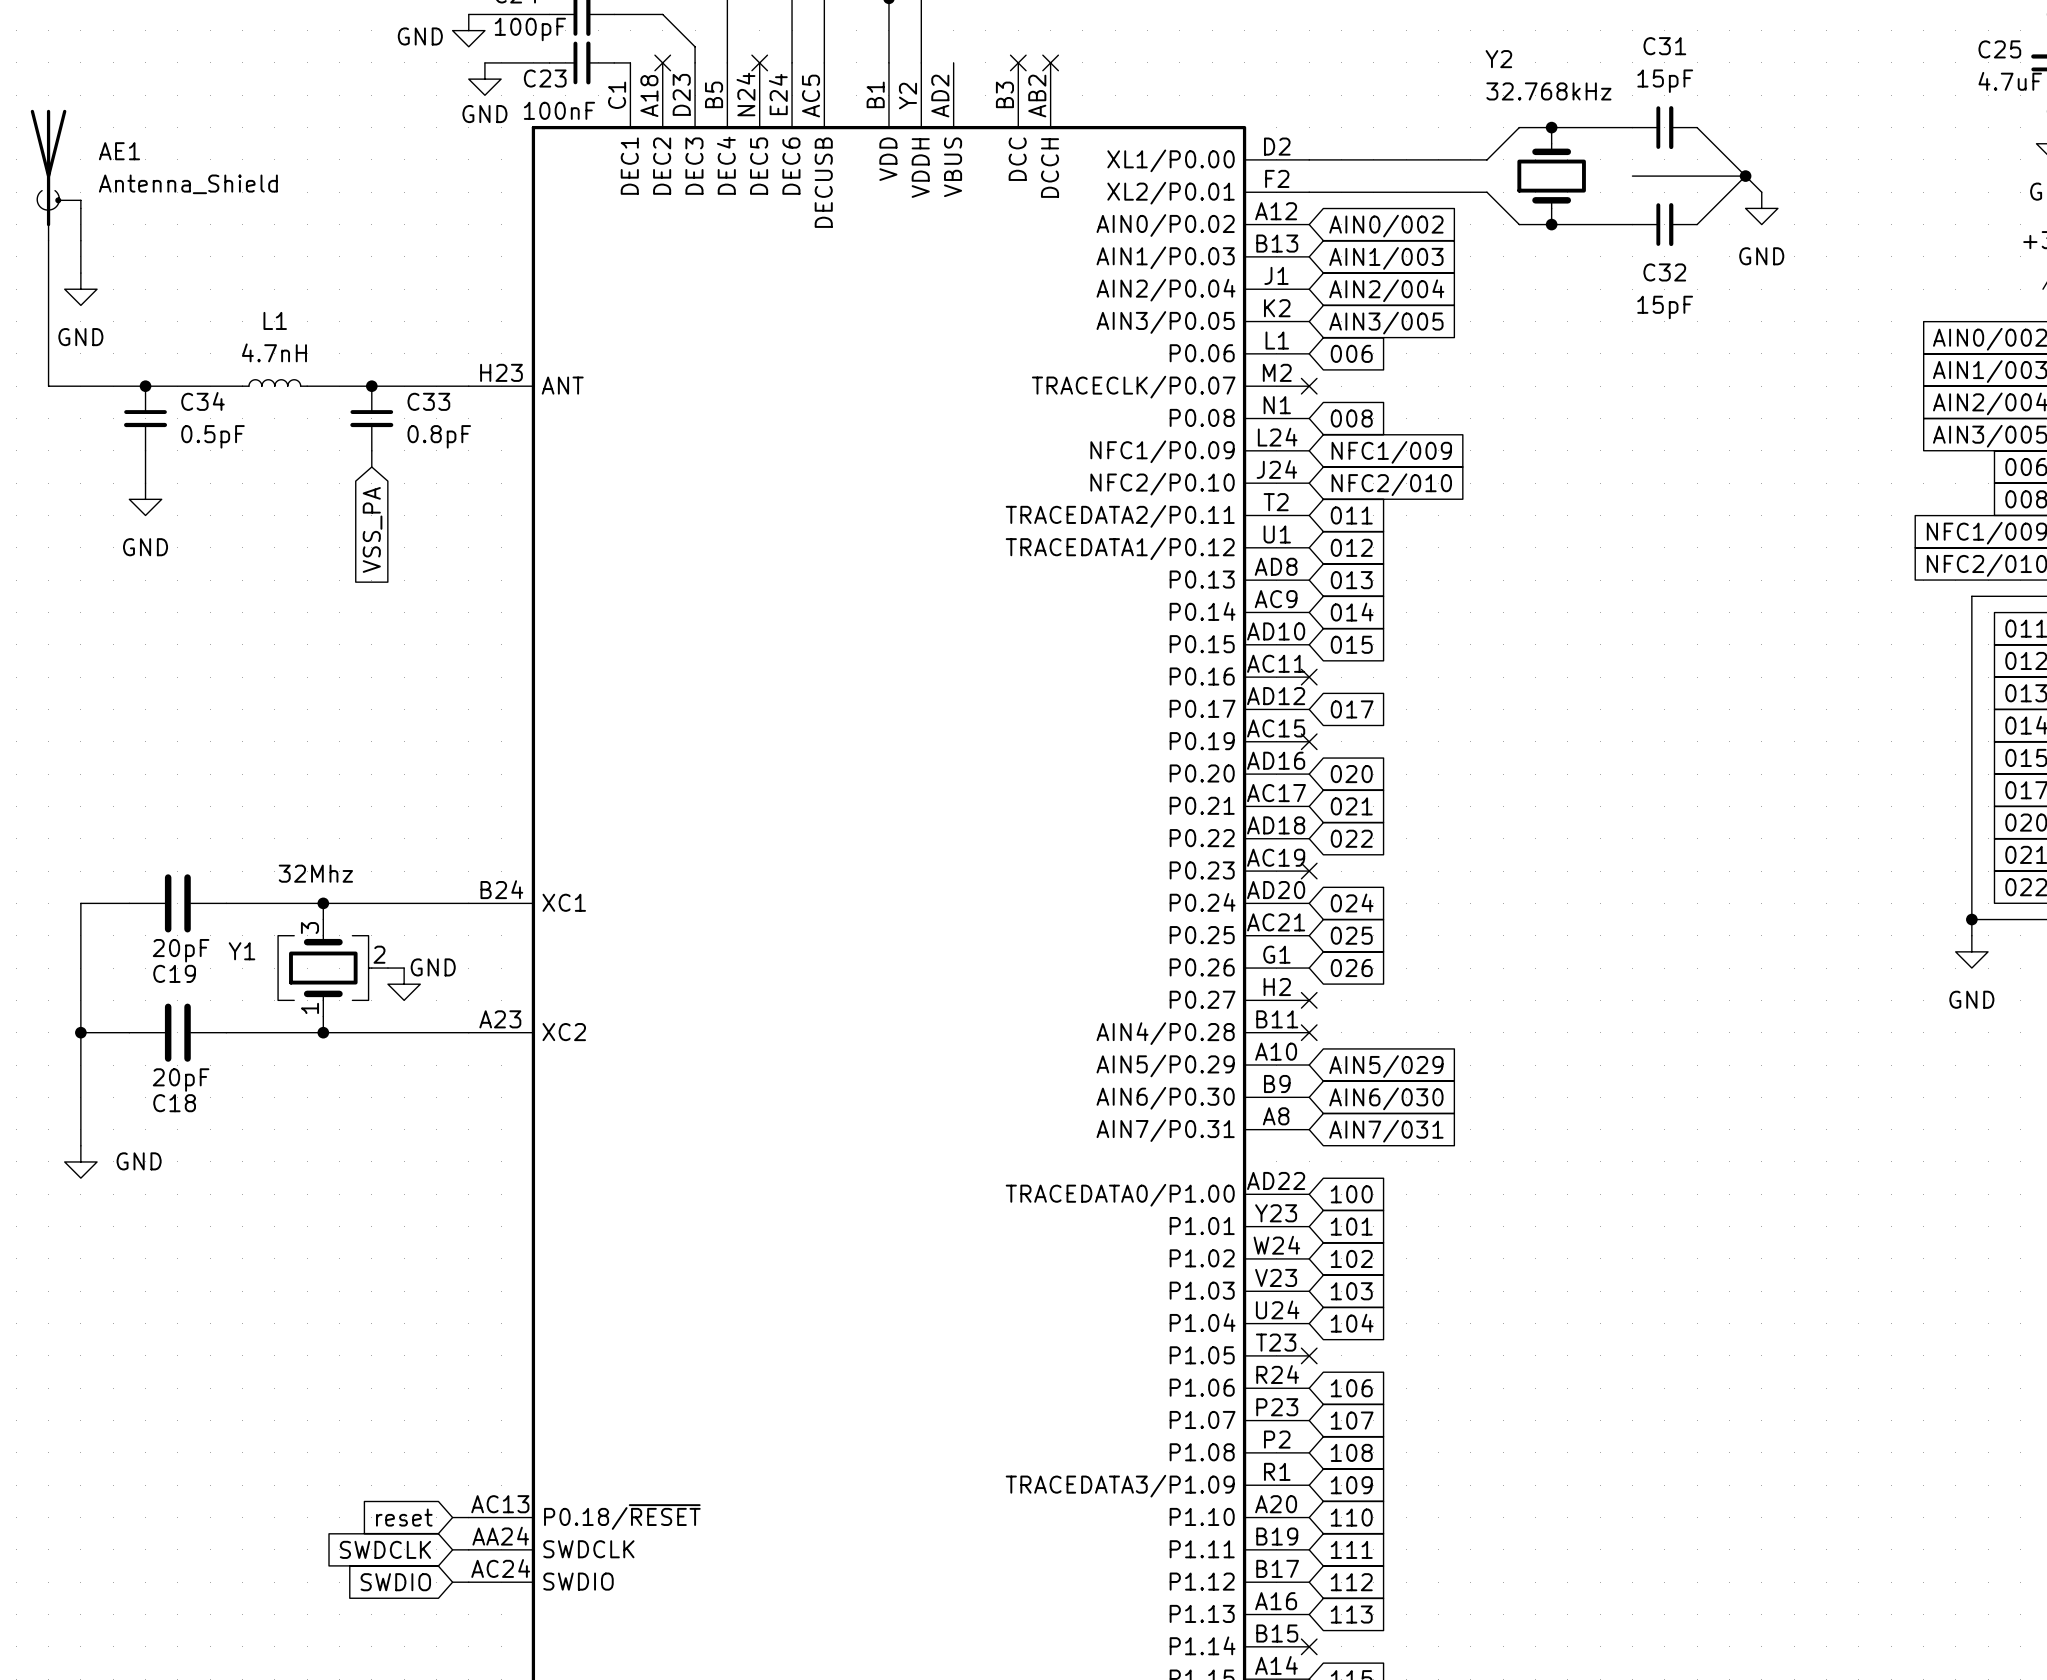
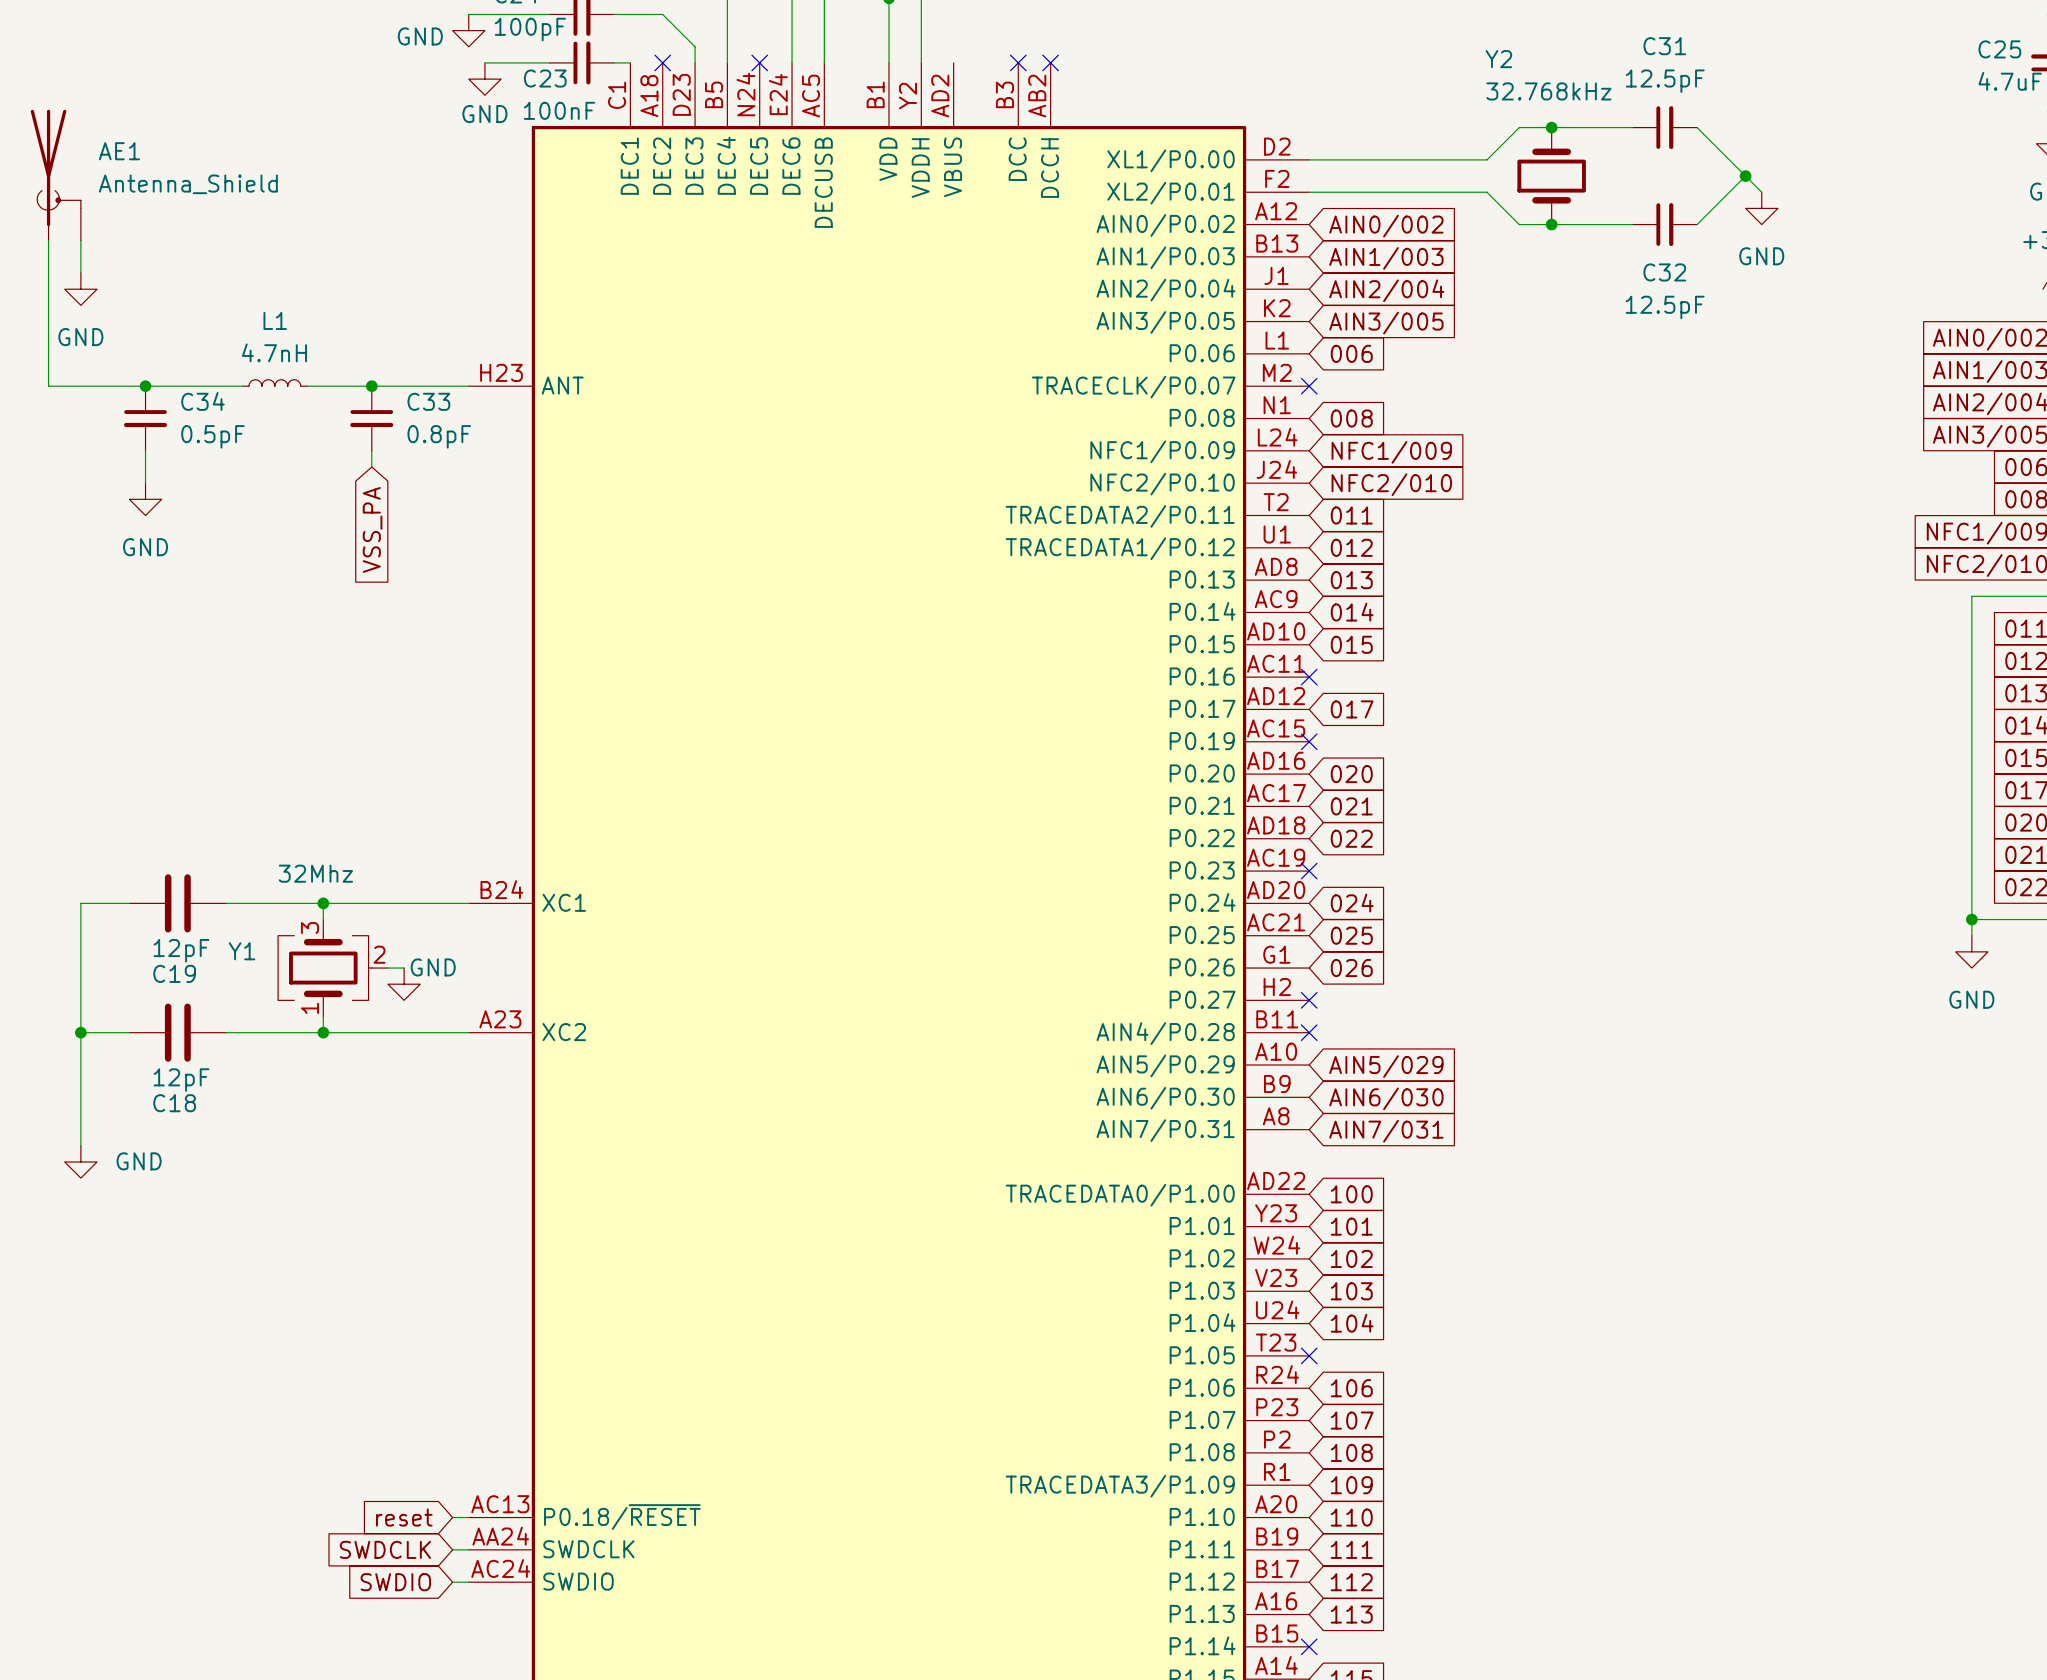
C31 value: 15pF (1665, 81) -> 12.5pF (1665, 81)
wire: (1632, 176) (1745, 176) -> none
C32 value: 15pF (1665, 307) -> 12.5pF (1665, 307)
C19 value: 20pF (181, 950) -> 12pF (181, 950)
C18 value: 20pF (181, 1080) -> 12pF (181, 1080)

